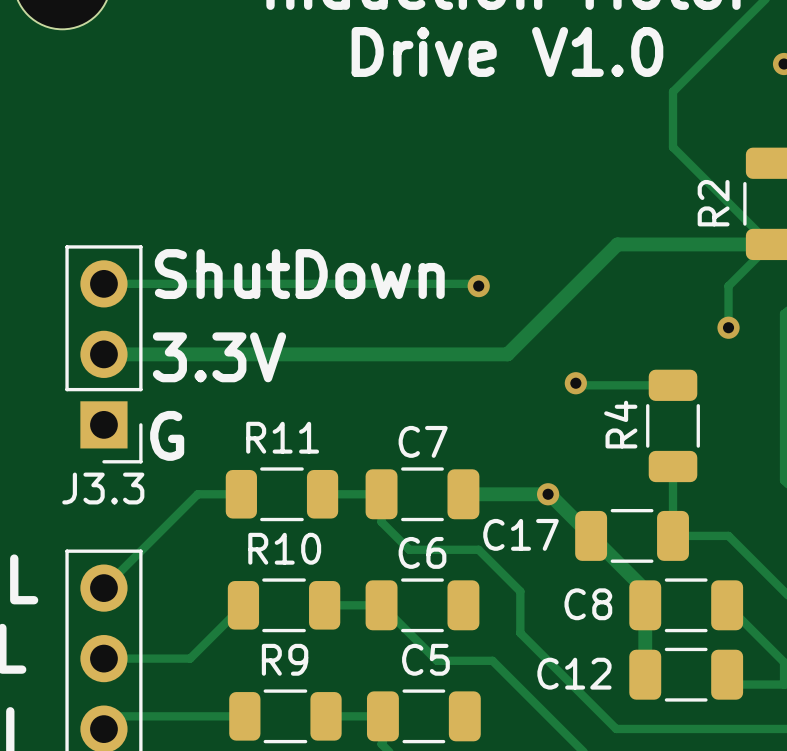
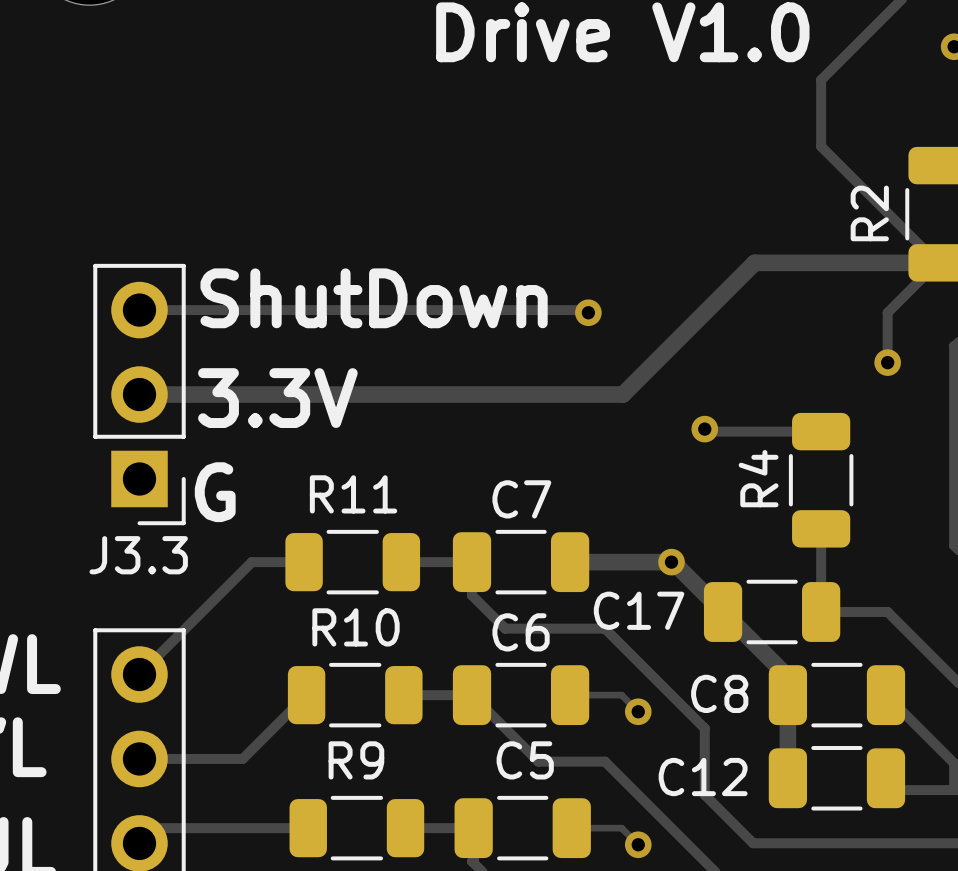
track: (478, 549) (520, 591) (520, 633) (575, 688) -> (588, 628) (605, 628) (704, 728) (704, 794)
track: none -> (570, 695) (621, 695) (638, 711)
via: none -> (638, 711)
track: none -> (571, 828) (621, 828) (638, 844)
via: none -> (638, 844)

